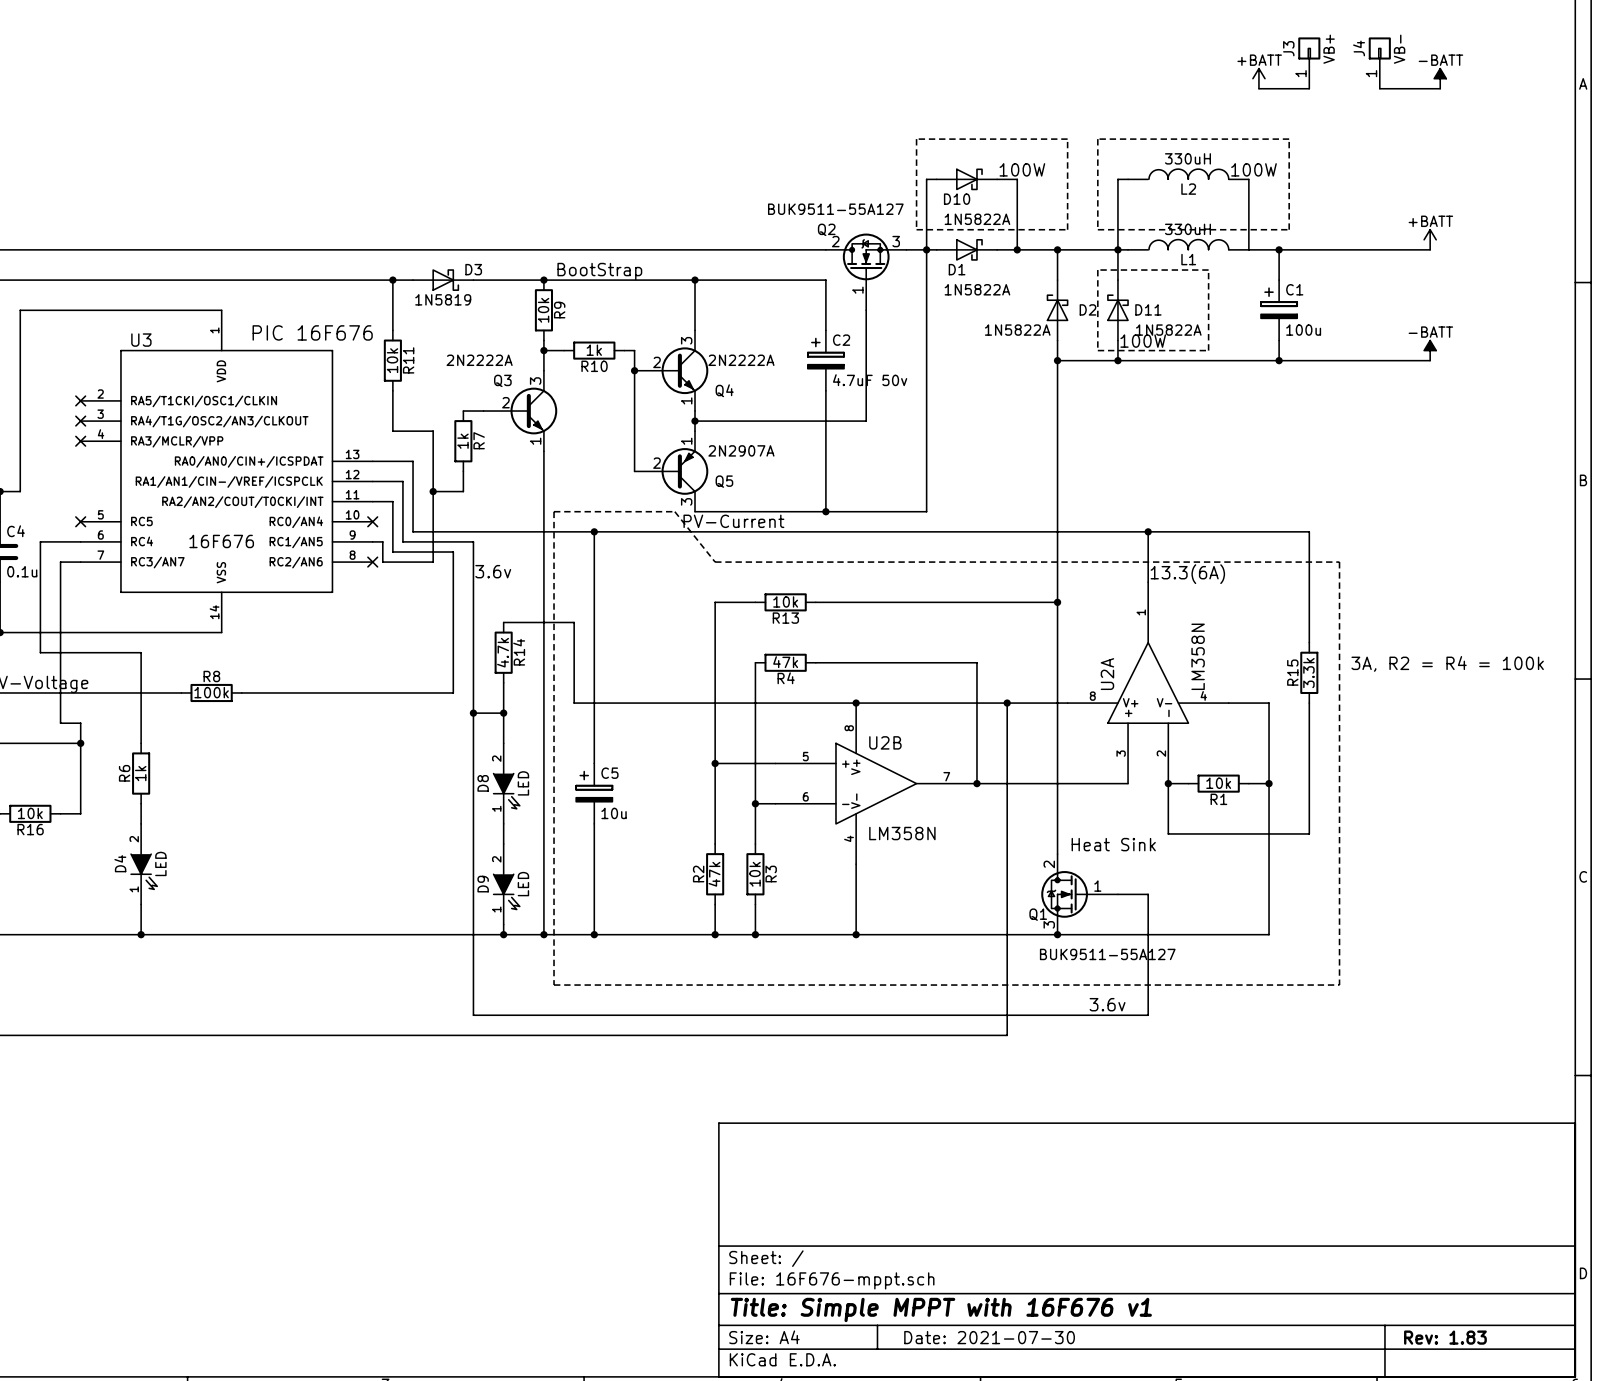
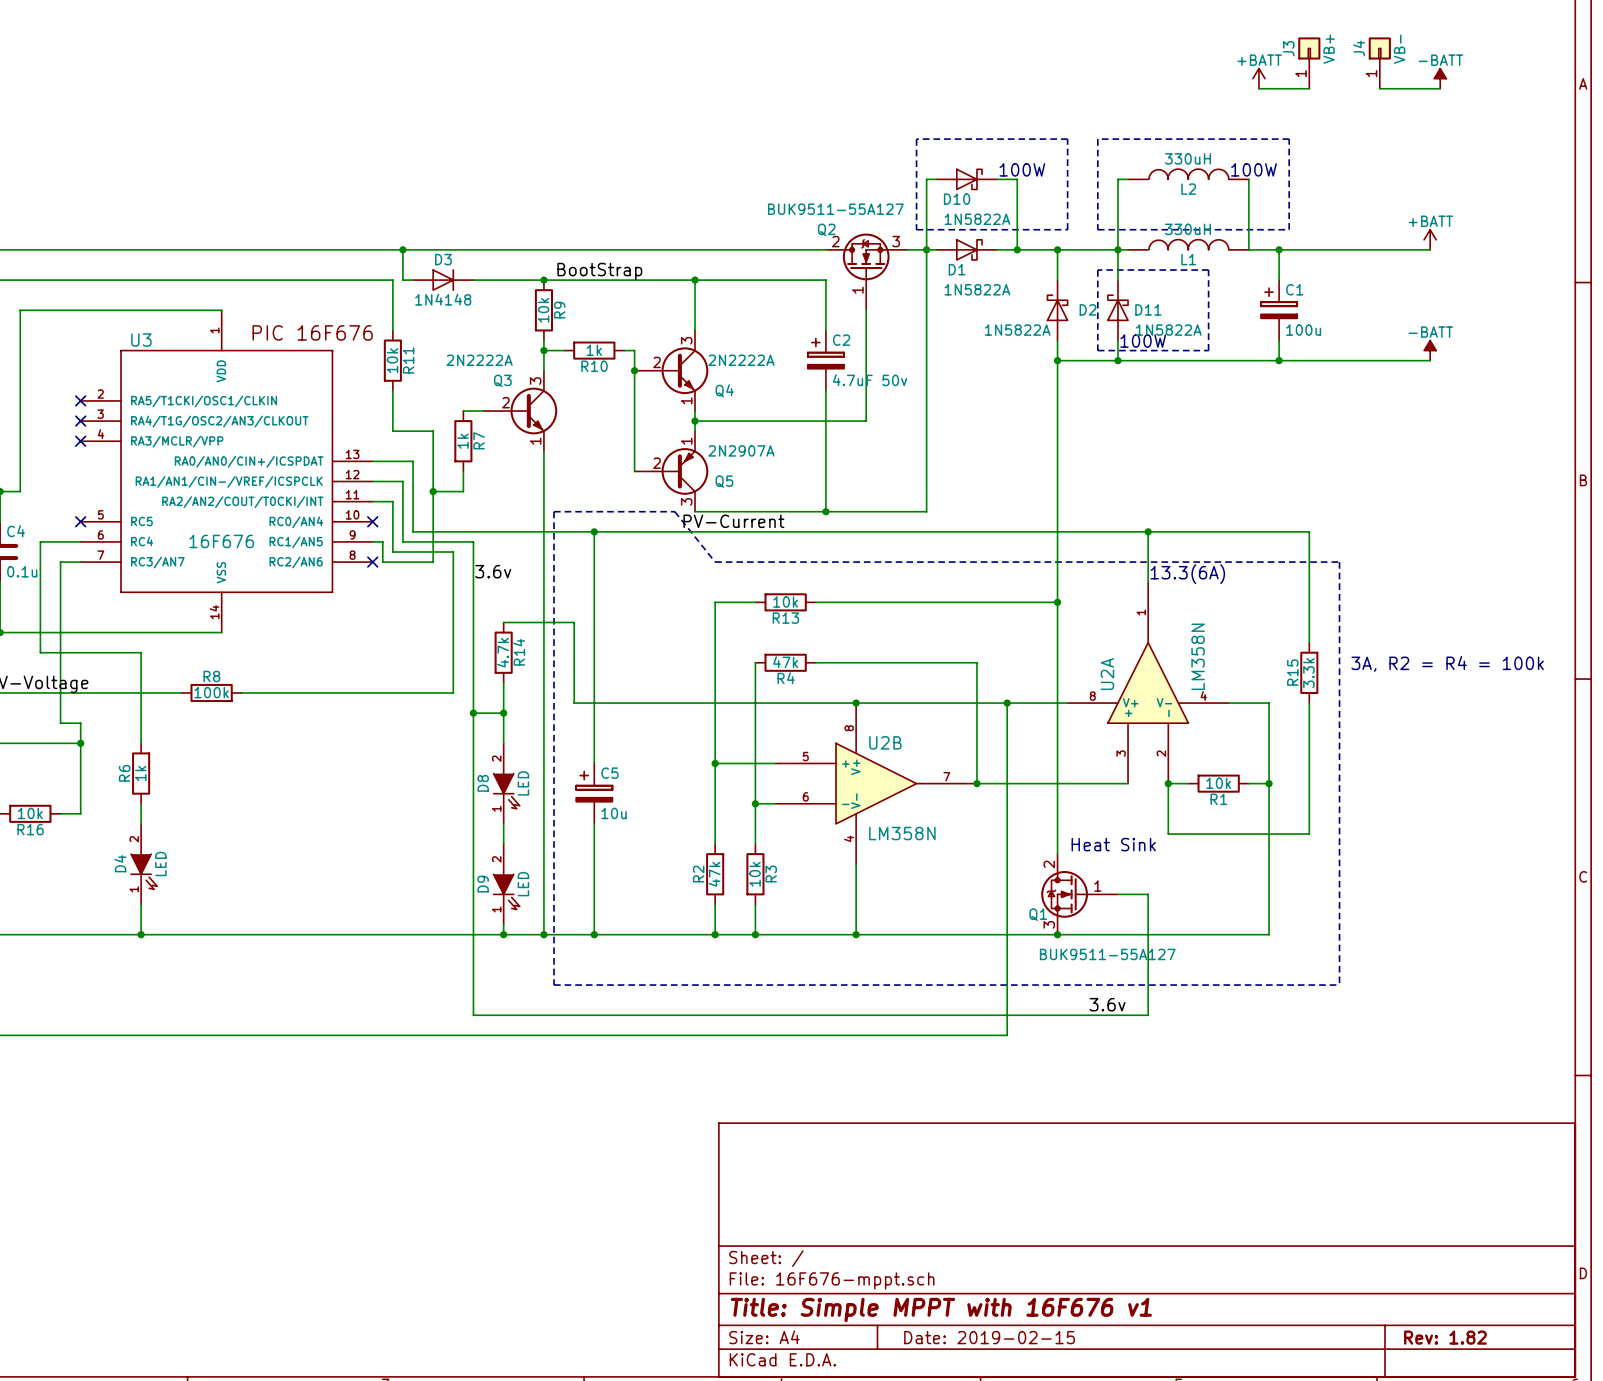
D3 symbol: [413, 269, 474, 291] -> [413, 269, 474, 291]
D3 name position: D3 (473, 269) -> D3 (443, 259)
wire: (392, 280) (402, 280) -> (402, 249) (402, 280)
junction position: (392, 280) -> (402, 249)
D3 value: 1N5819 (443, 299) -> 1N4148 (443, 299)
title block: Date: 2021-07-30 (989, 1337) -> Date: 2019-02-15 (989, 1337)
title block: Rev: 1.83 (1445, 1337) -> Rev: 1.82 (1445, 1337)

